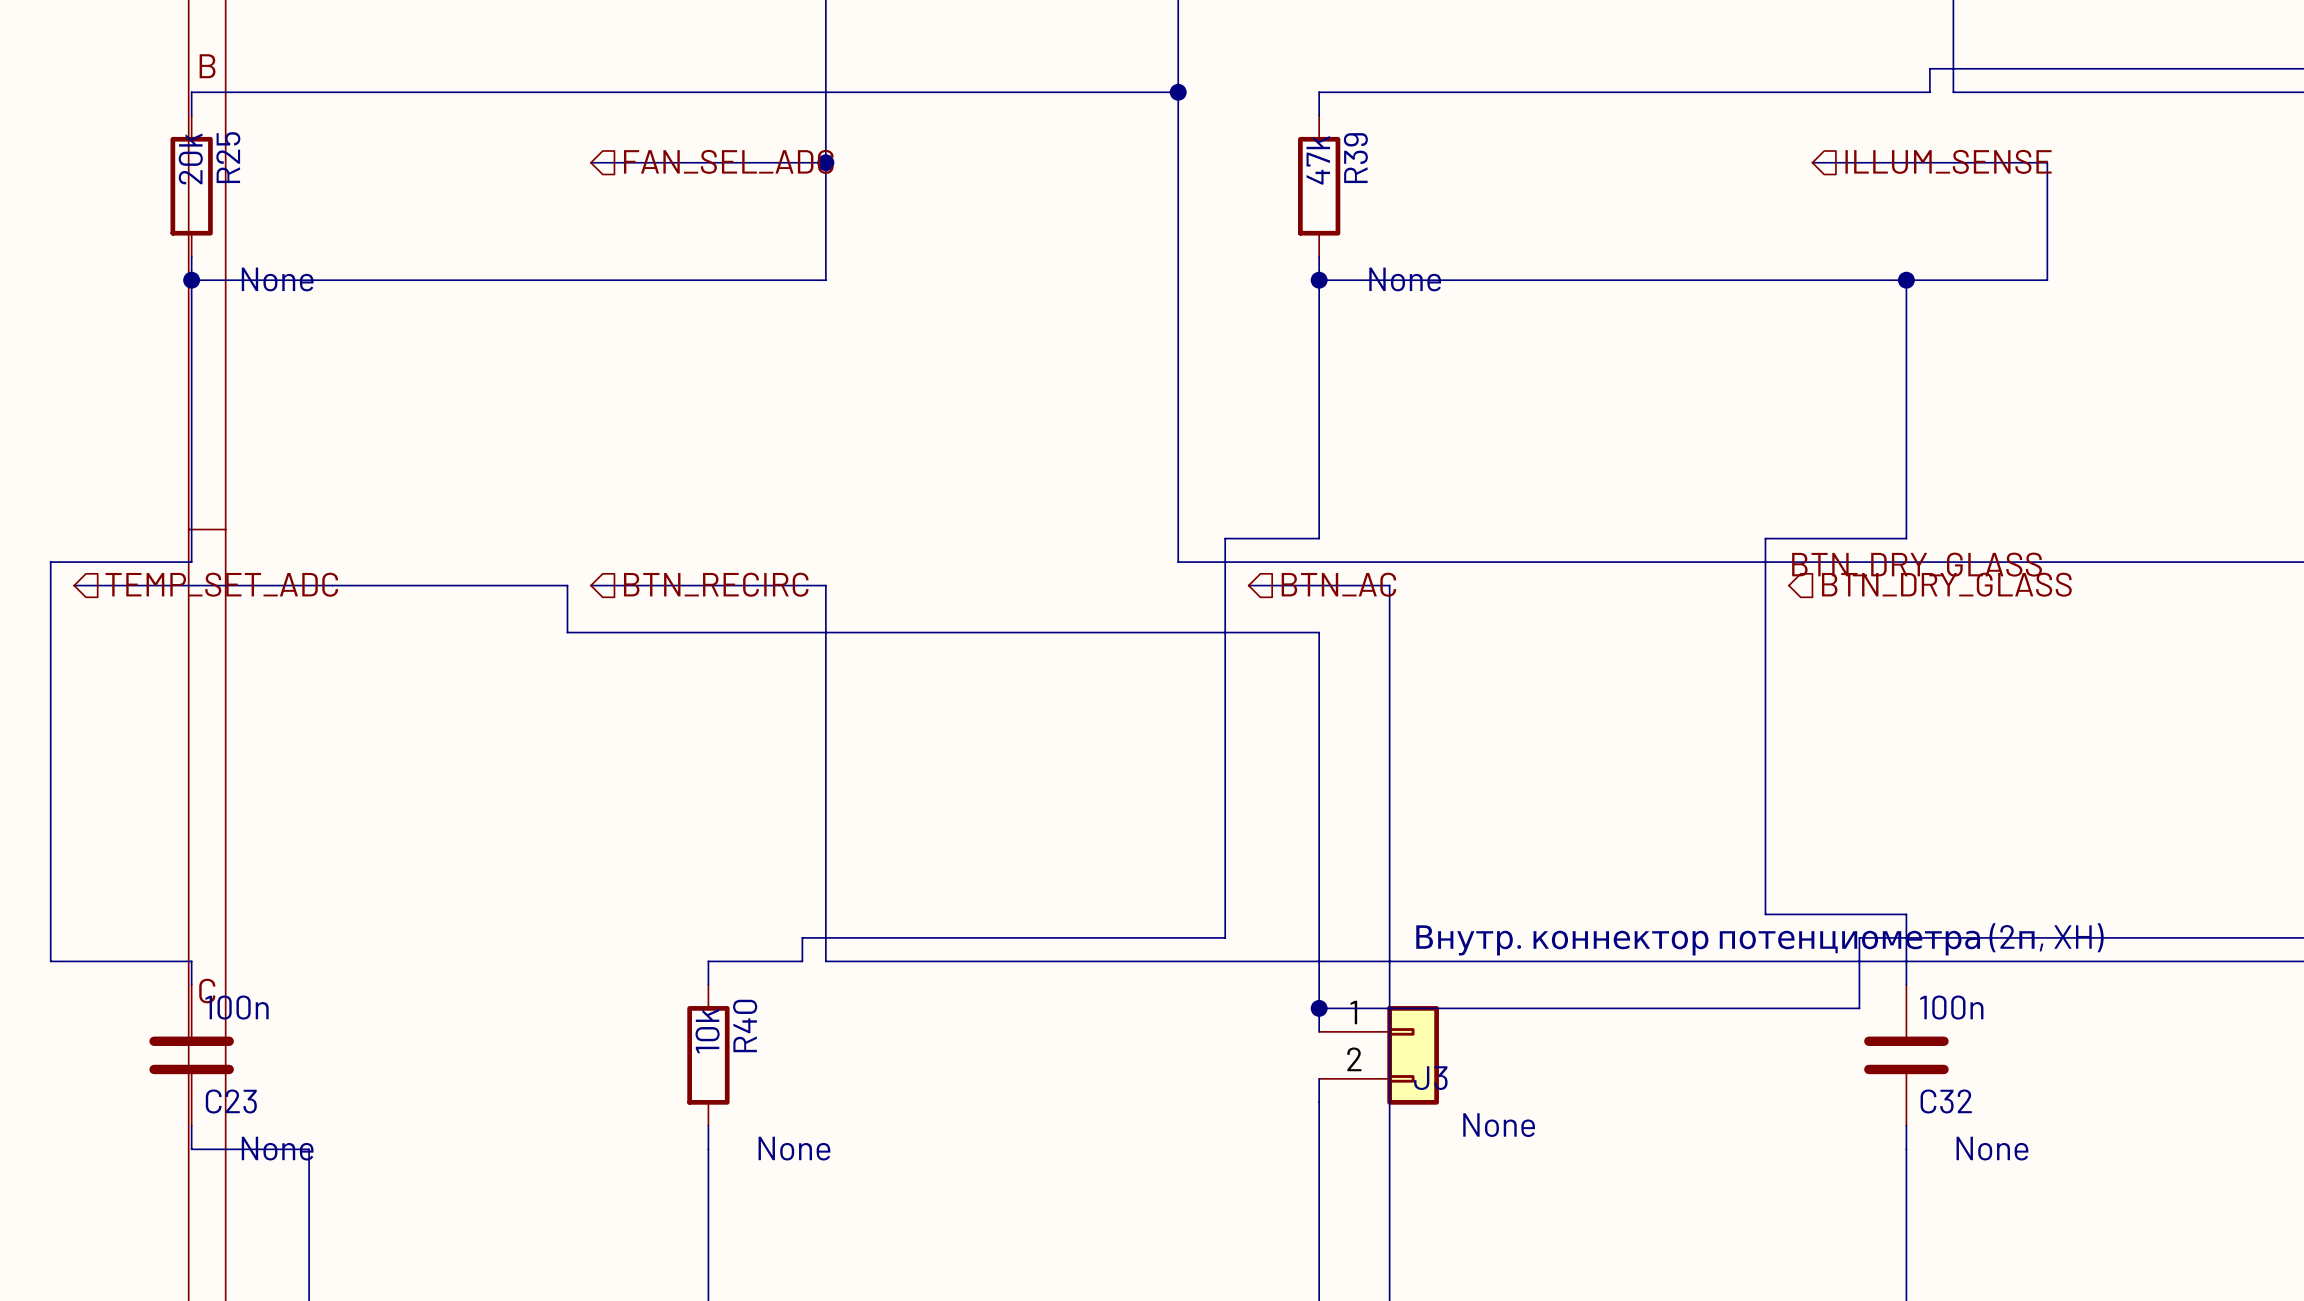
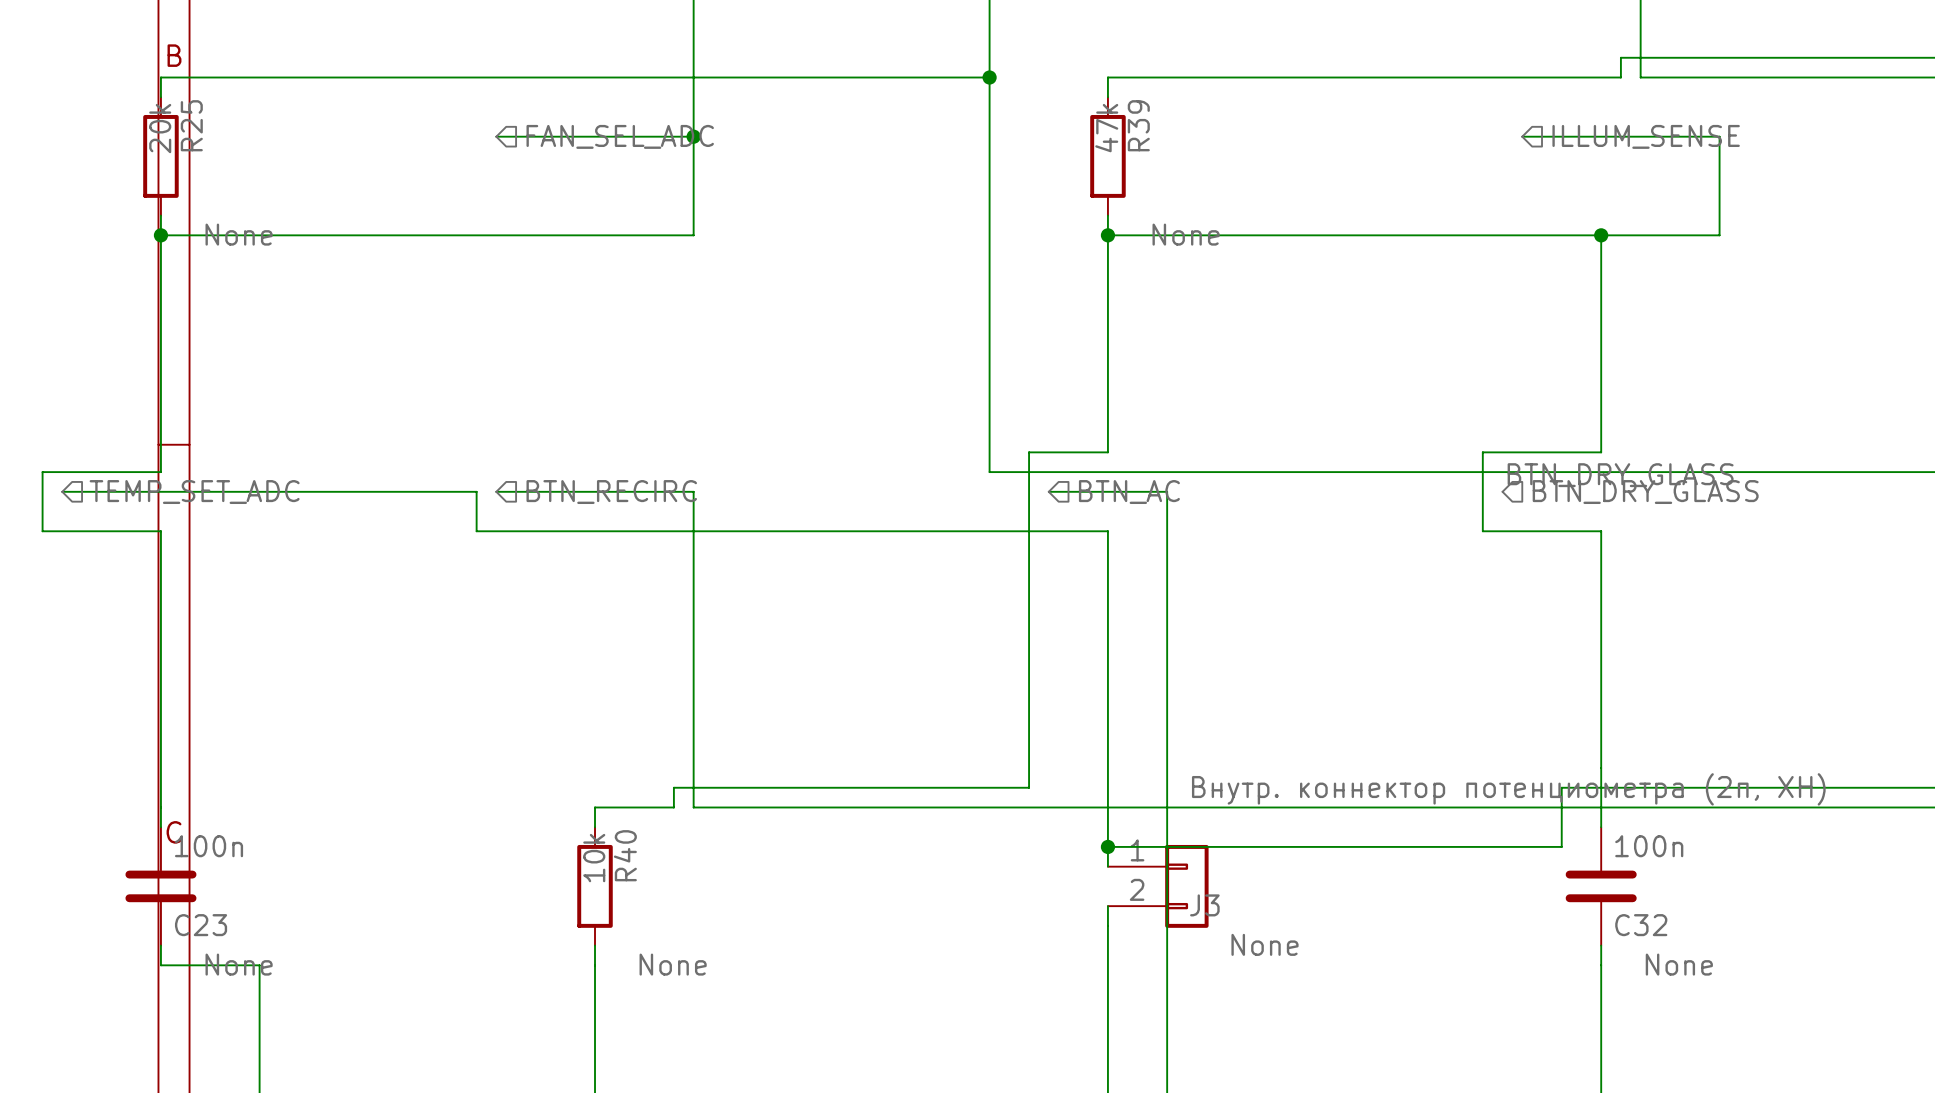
wire: (50, 632) (50, 961) (191, 961) -> (42, 531) (160, 531) (160, 807)
wire: (1765, 632) (1765, 914) (1906, 914) -> (1482, 531) (1601, 531) (1601, 768)

